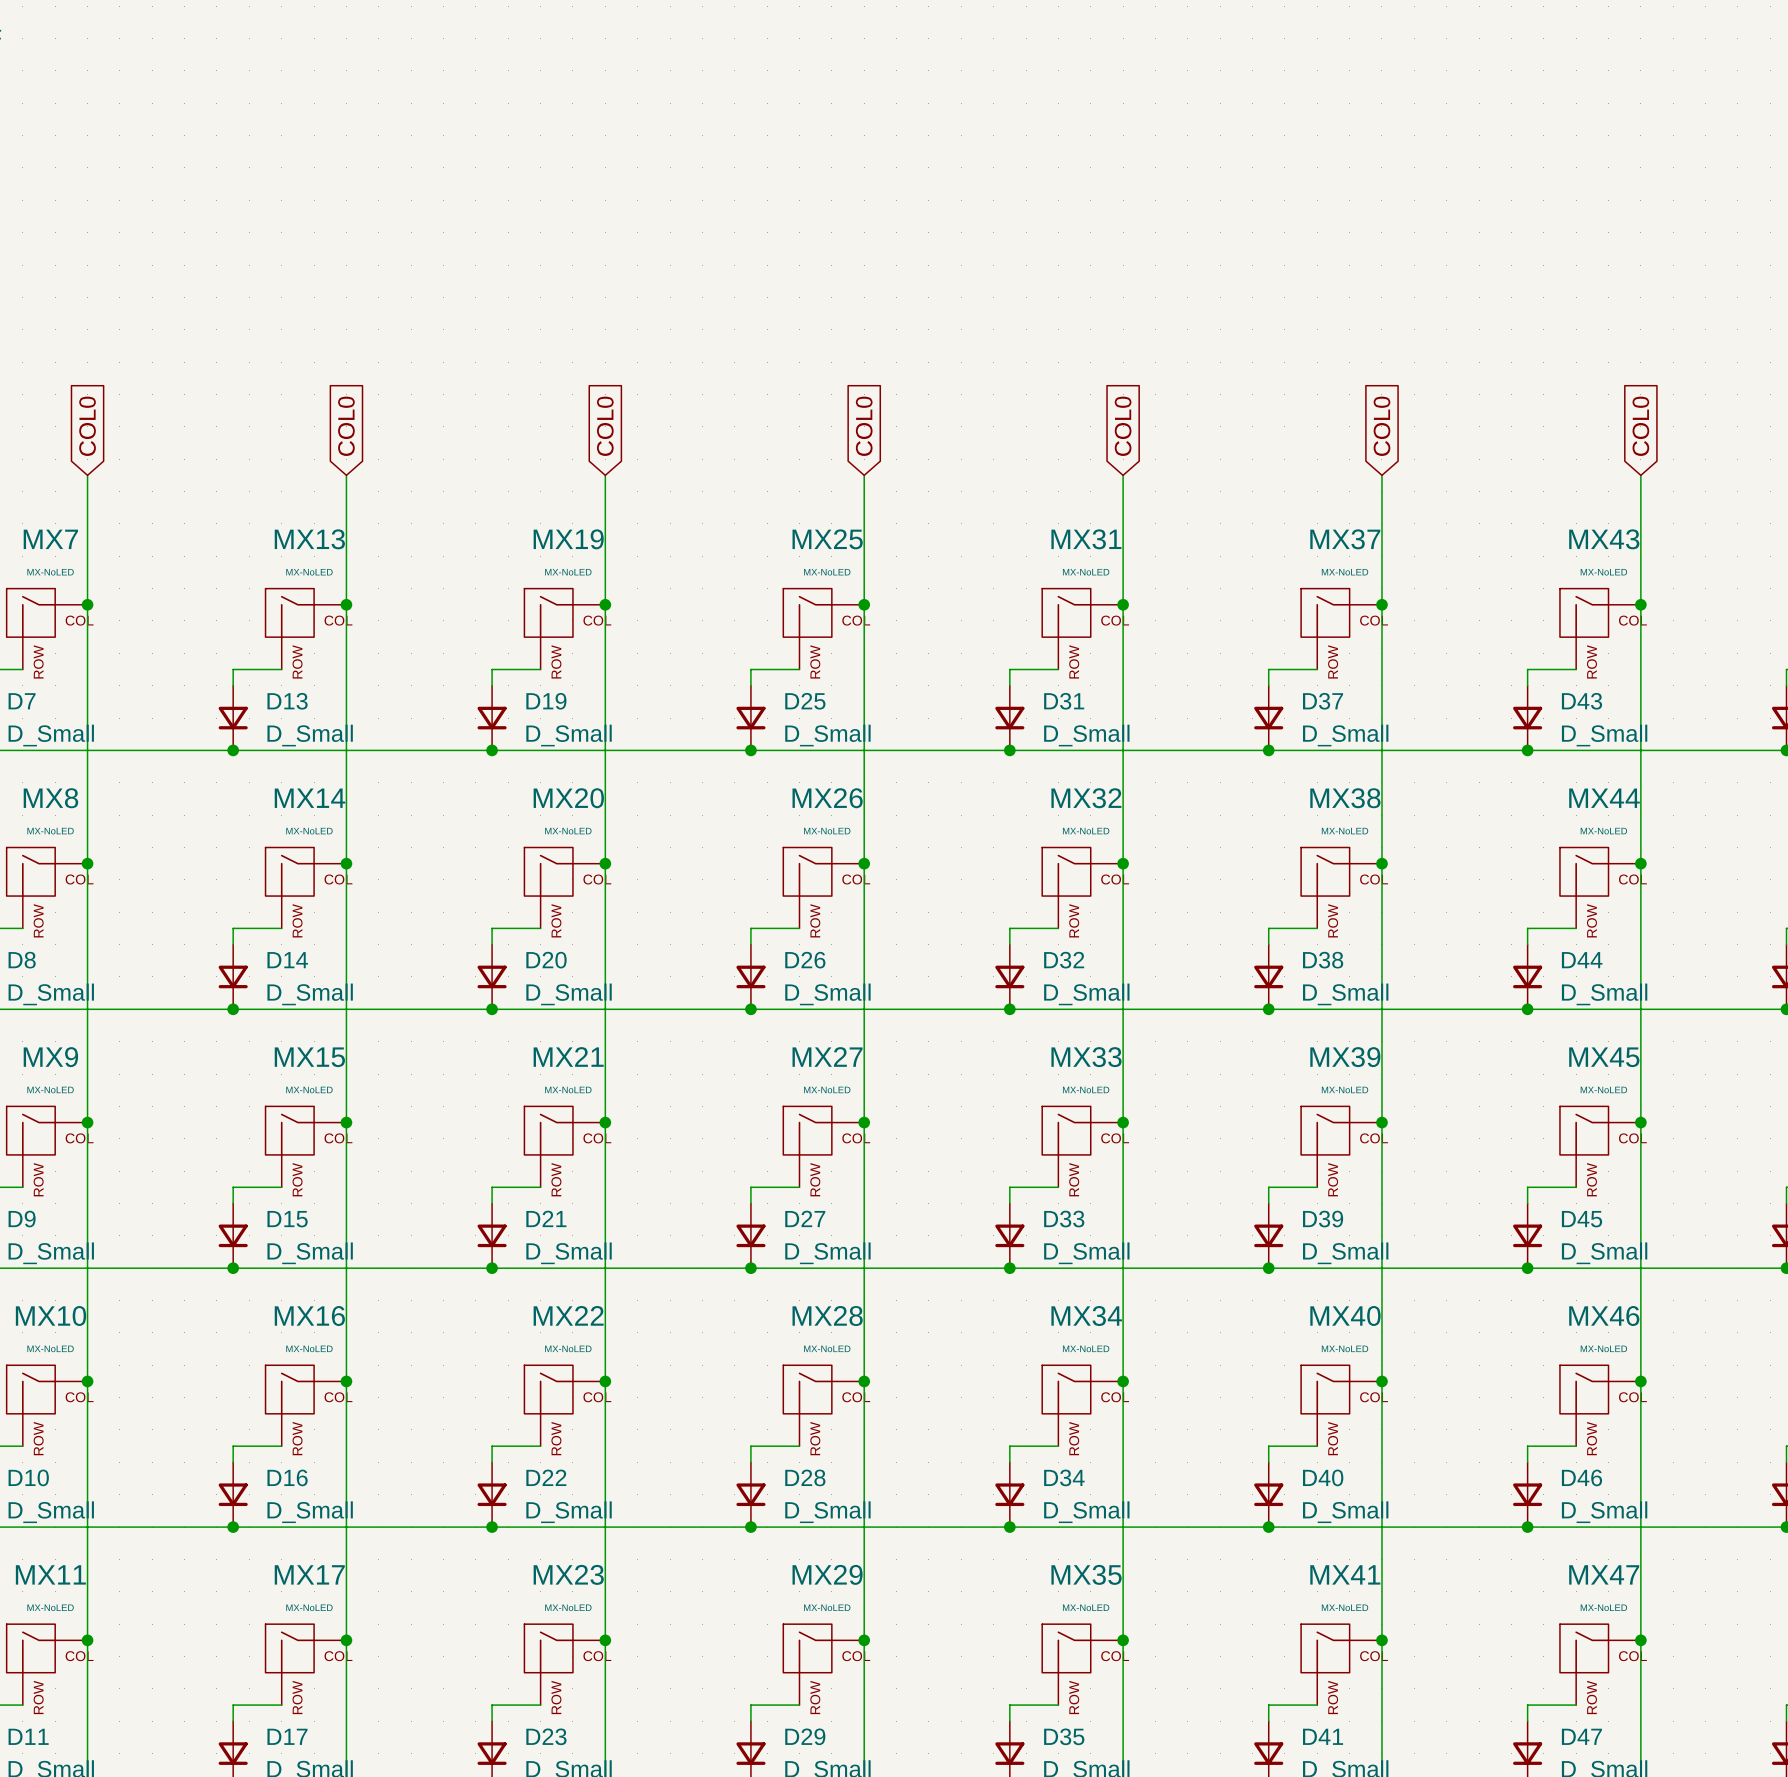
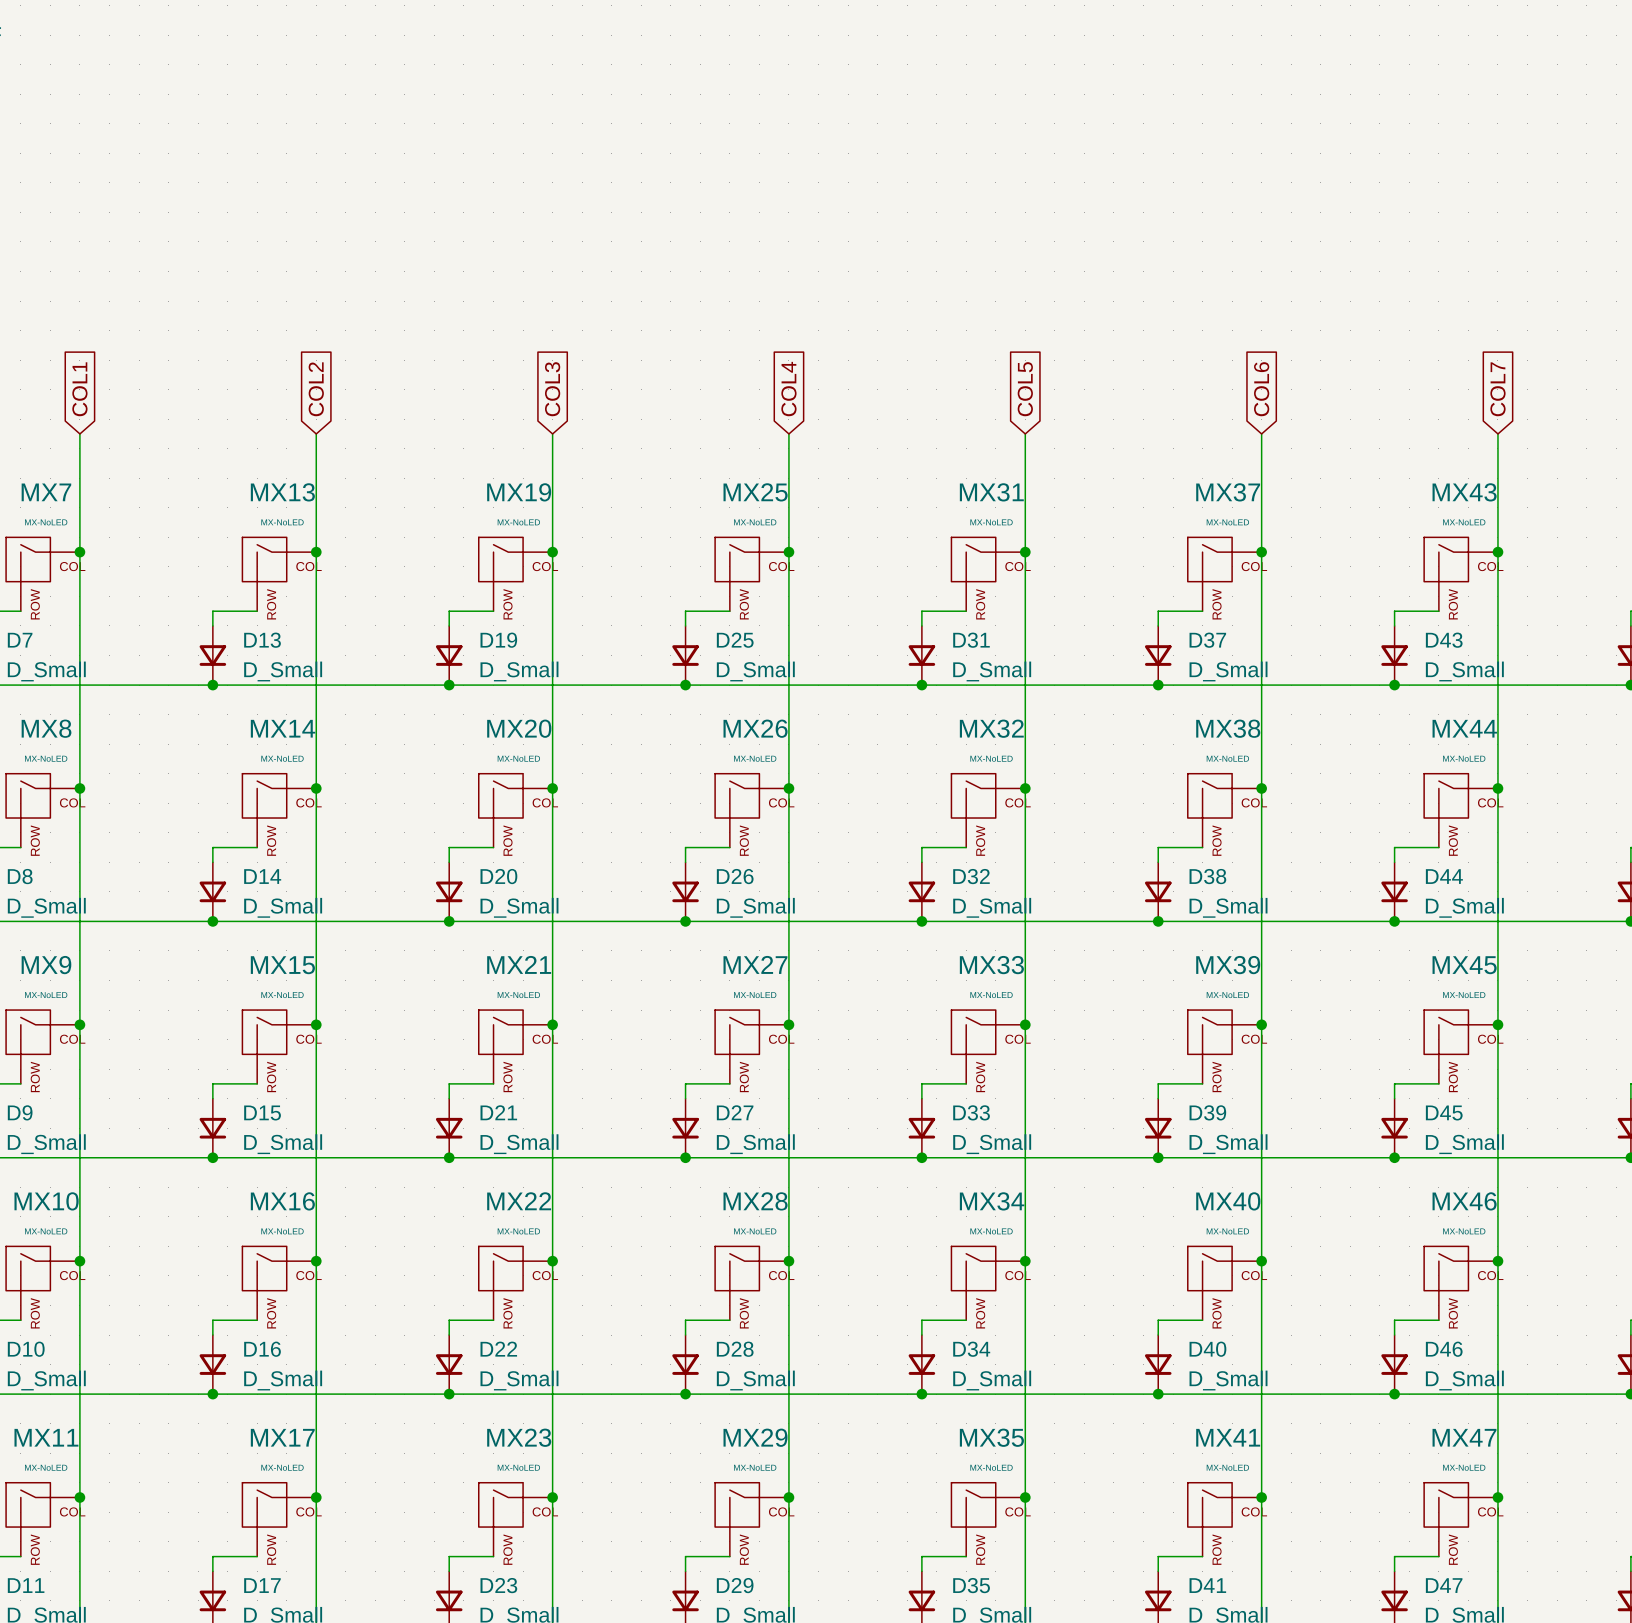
global label: COL0 (87, 426) -> COL1 (79, 389)
global label: COL0 (346, 426) -> COL2 (316, 389)
global label: COL0 (605, 426) -> COL3 (552, 389)
global label: COL0 (864, 426) -> COL4 (788, 389)
global label: COL0 (1123, 426) -> COL5 (1025, 389)
global label: COL0 (1381, 426) -> COL6 (1261, 389)
global label: COL0 (1640, 426) -> COL7 (1497, 389)

